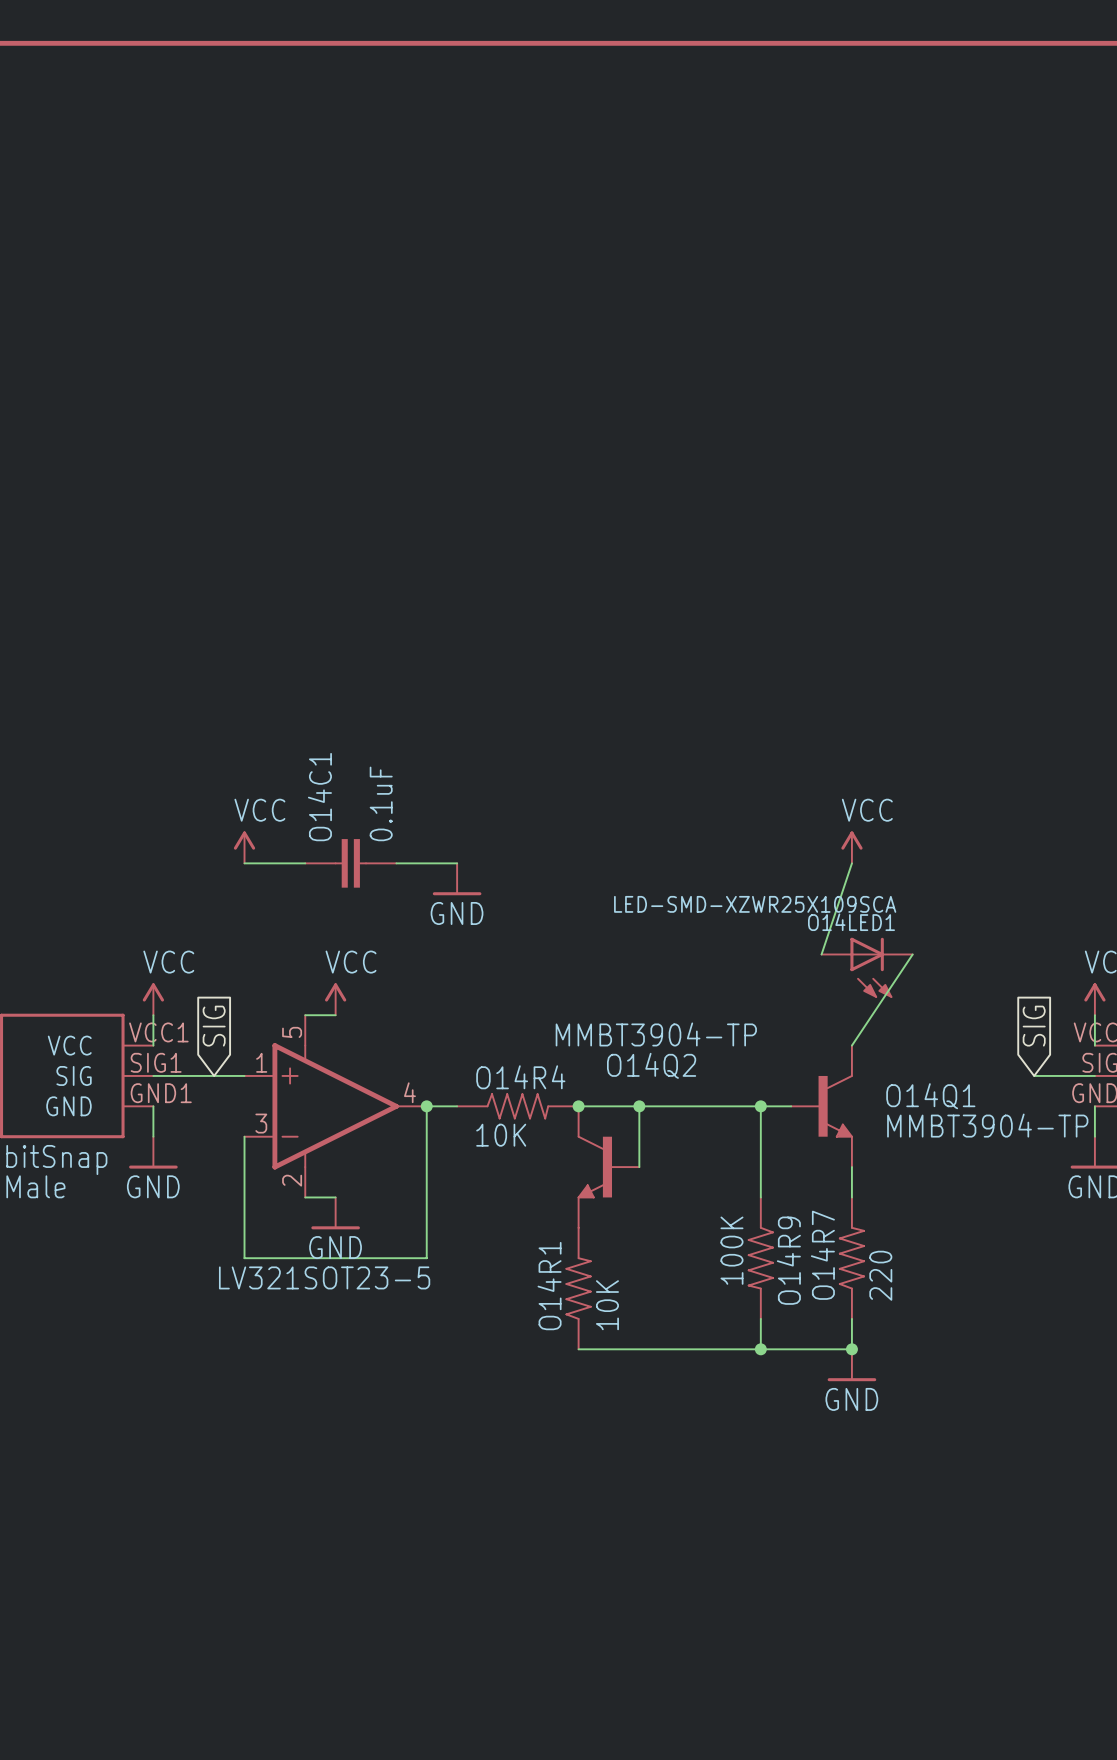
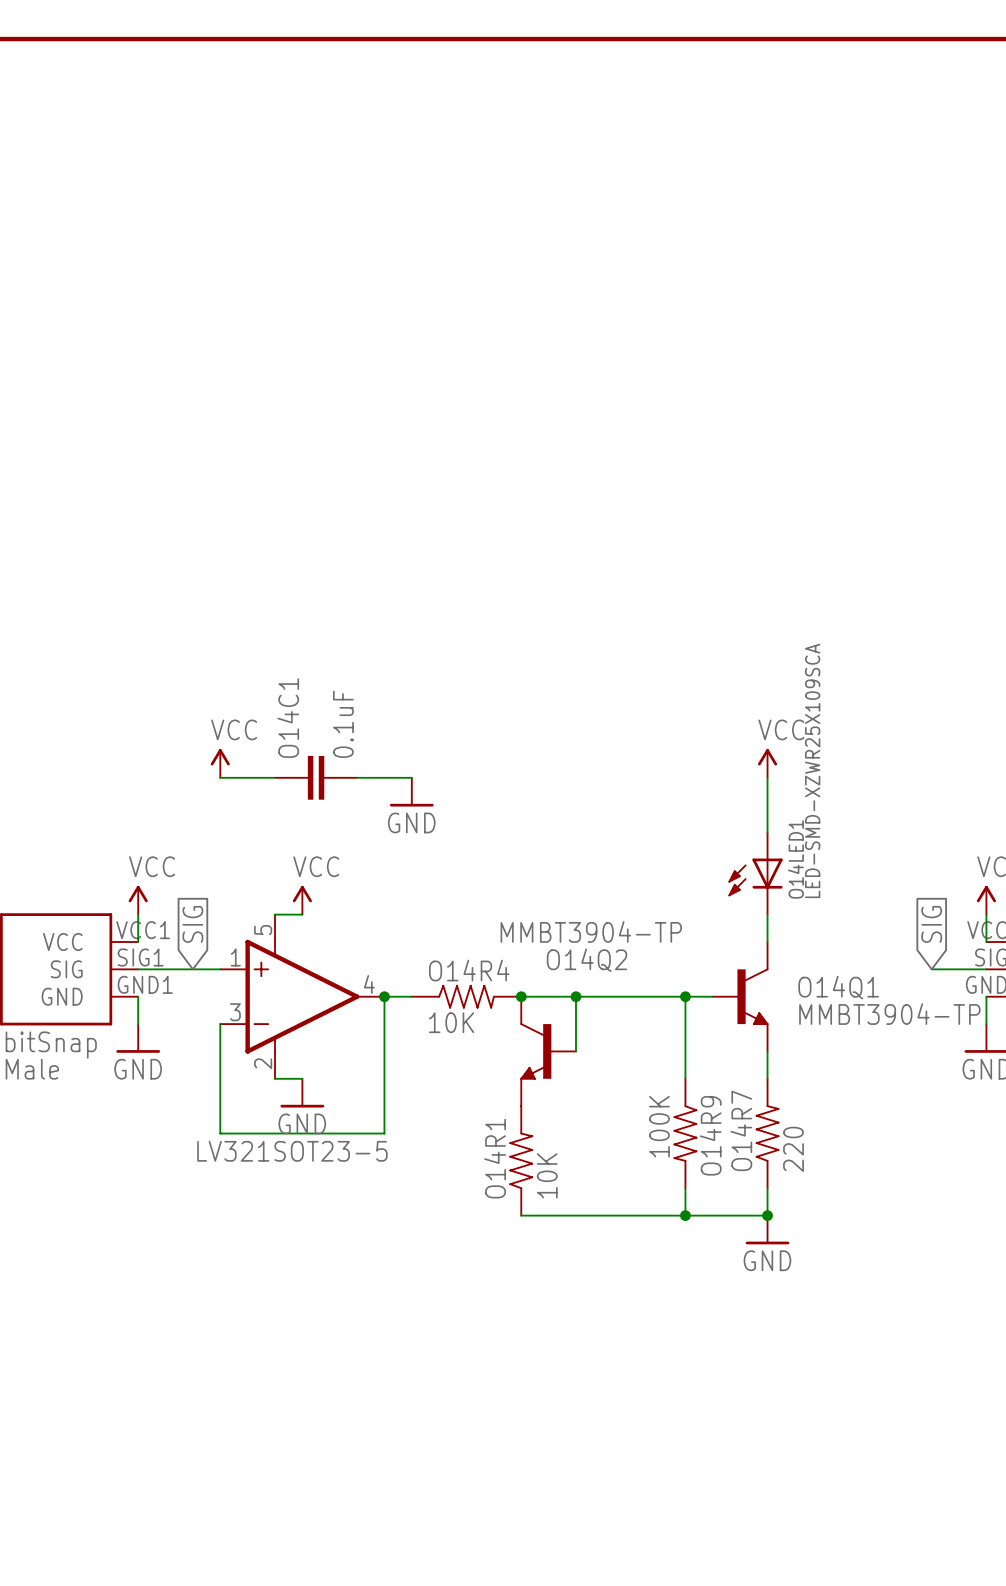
wire: (851, 863) (821, 954) -> (767, 777) (767, 832)
wire: (912, 954) (851, 1045) -> (767, 914) (767, 941)
O14LED1 rotation: 0° (871, 967) -> 90° clockwise (755, 877)

